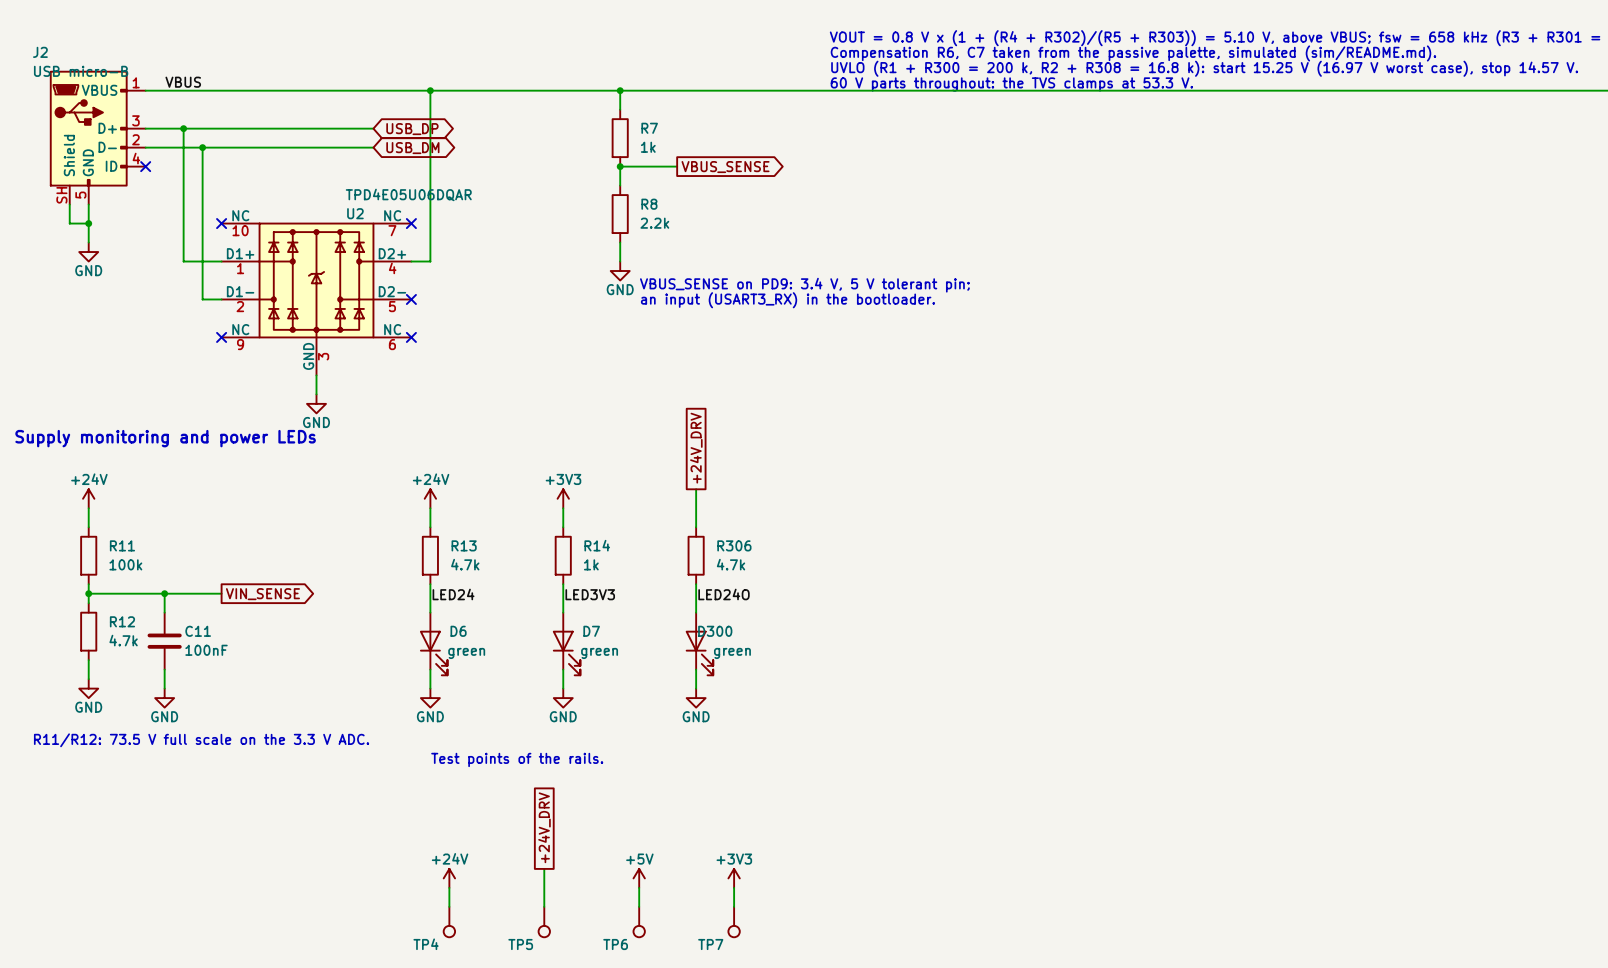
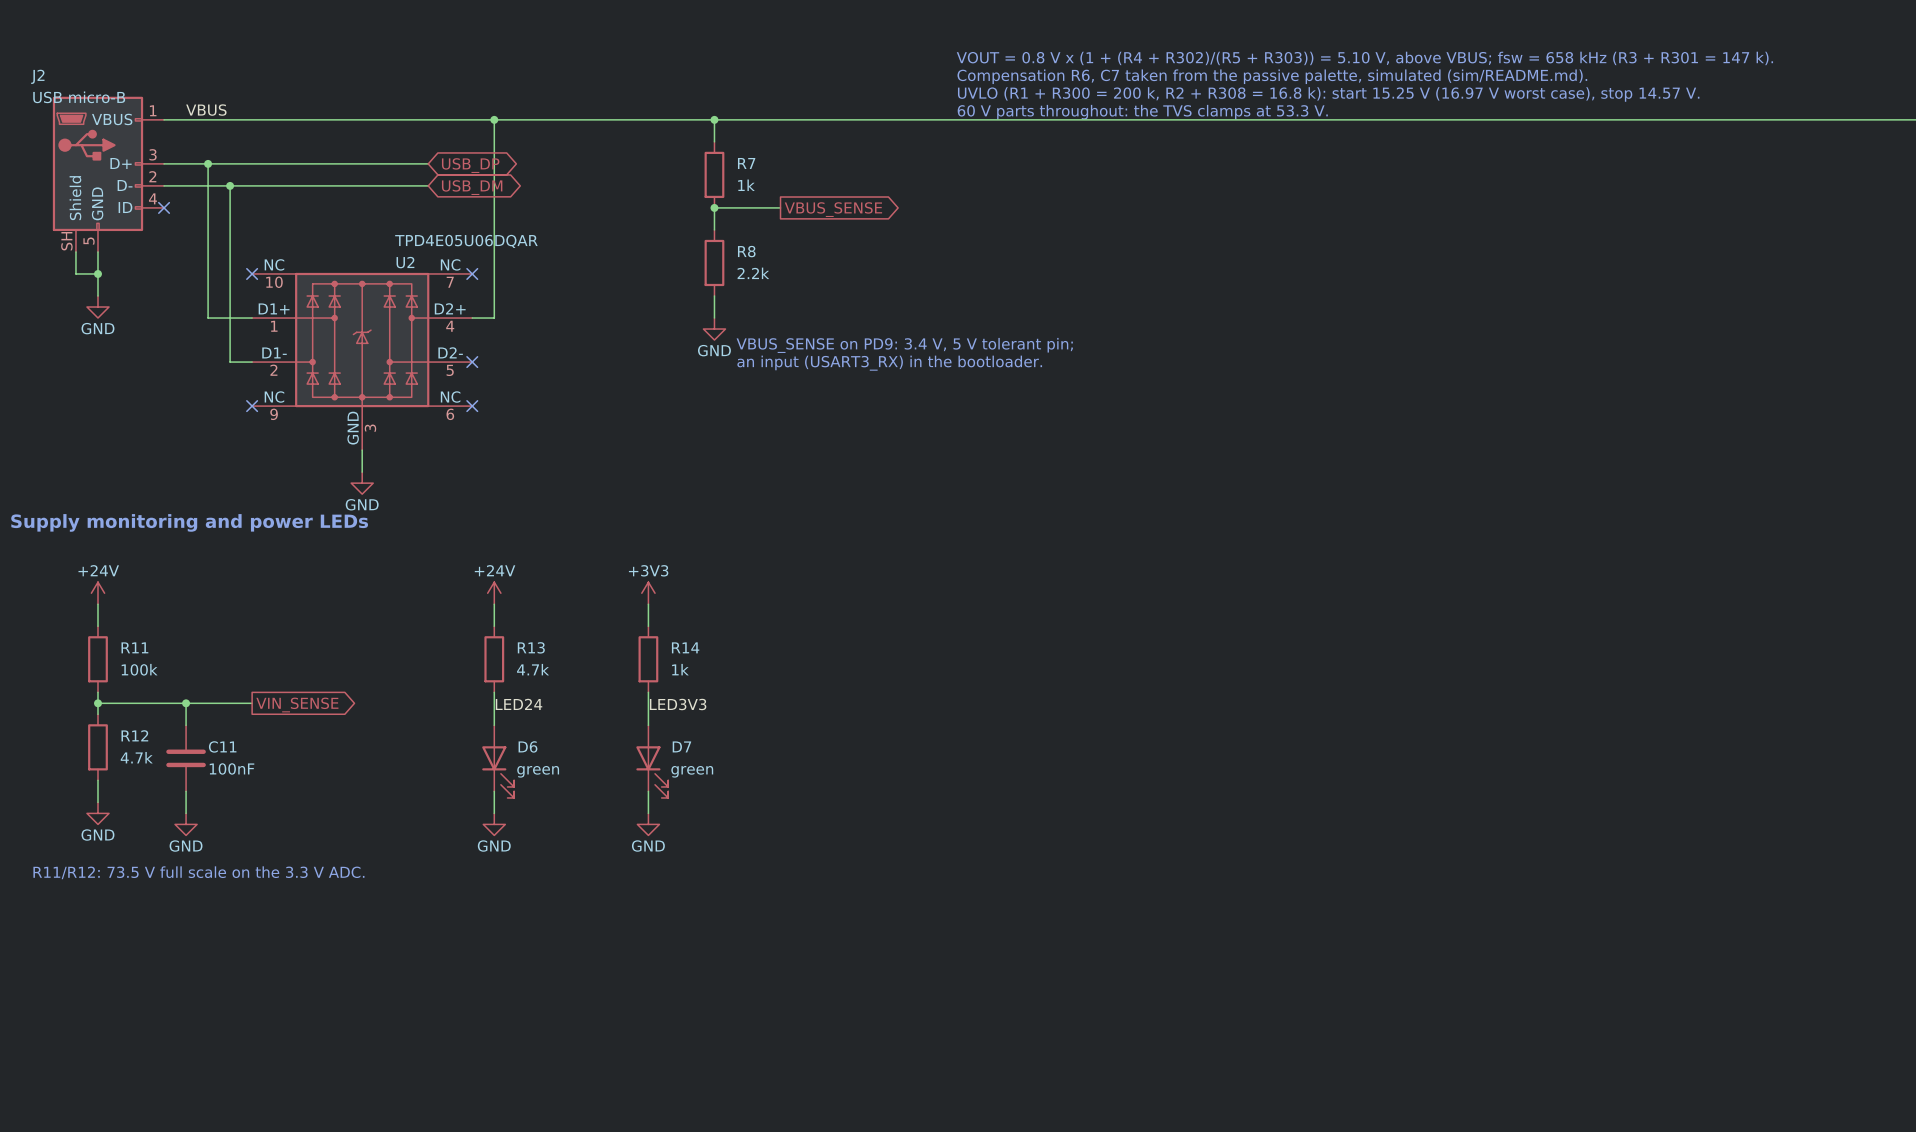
global label: +24V_DRV (696, 448) -> none
wire: (696, 489) (696, 527) -> none
R306: 4.7k (696, 555) -> none
wire: (696, 584) (696, 612) -> none
label: LED24O (724, 594) -> none
D300: green (699, 643) -> none
wire: (696, 669) (696, 688) -> none
power symbol: GND (696, 698) -> none
text: Test points of the rails. (517, 759) -> none
global label: +24V_DRV (544, 827) -> none
wire: (544, 868) (544, 906) -> none
power symbol: +24V (449, 878) -> none
power symbol: +5V (639, 878) -> none
power symbol: +3V3 (734, 878) -> none
wire: (449, 887) (449, 906) -> none
wire: (639, 887) (639, 906) -> none
wire: (734, 887) (734, 906) -> none
TP4: (449, 922) -> none
TP5: (544, 922) -> none
TP6: (639, 922) -> none
TP7: (734, 922) -> none

